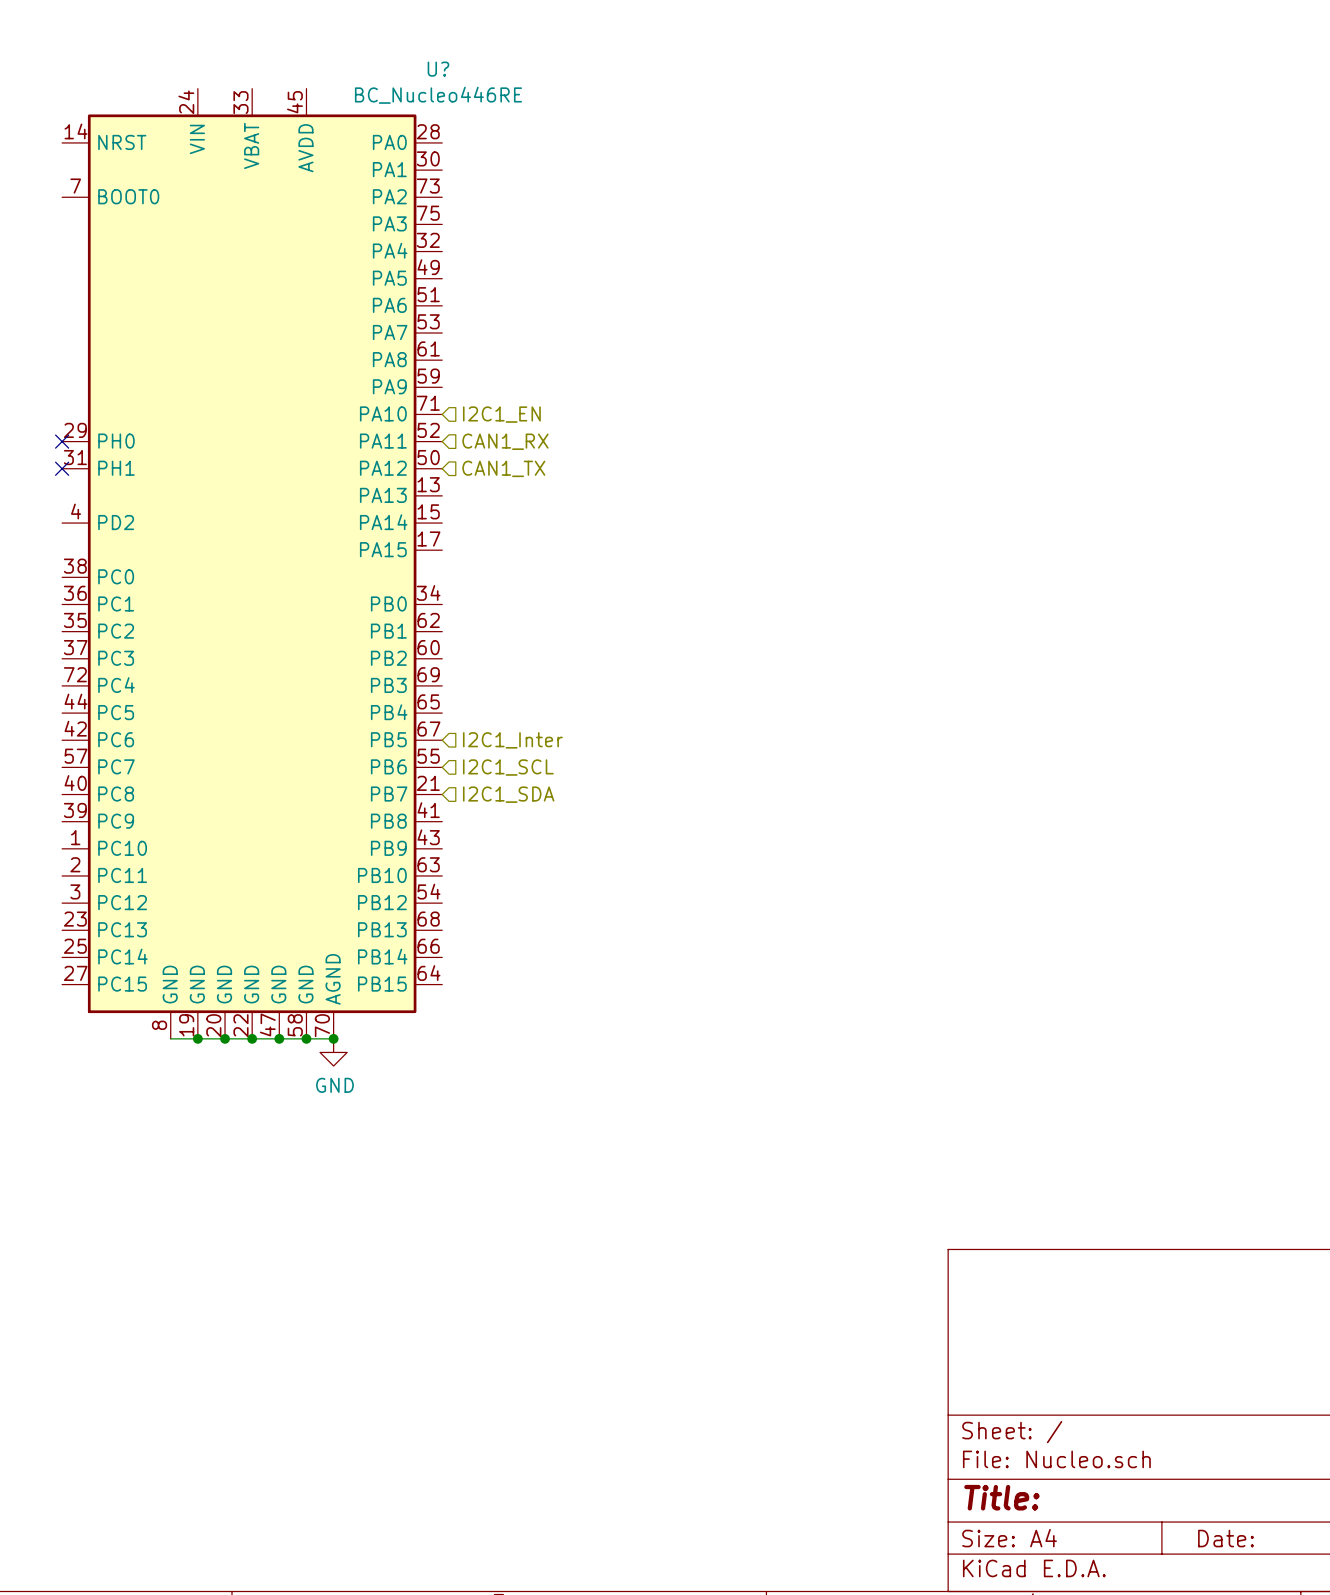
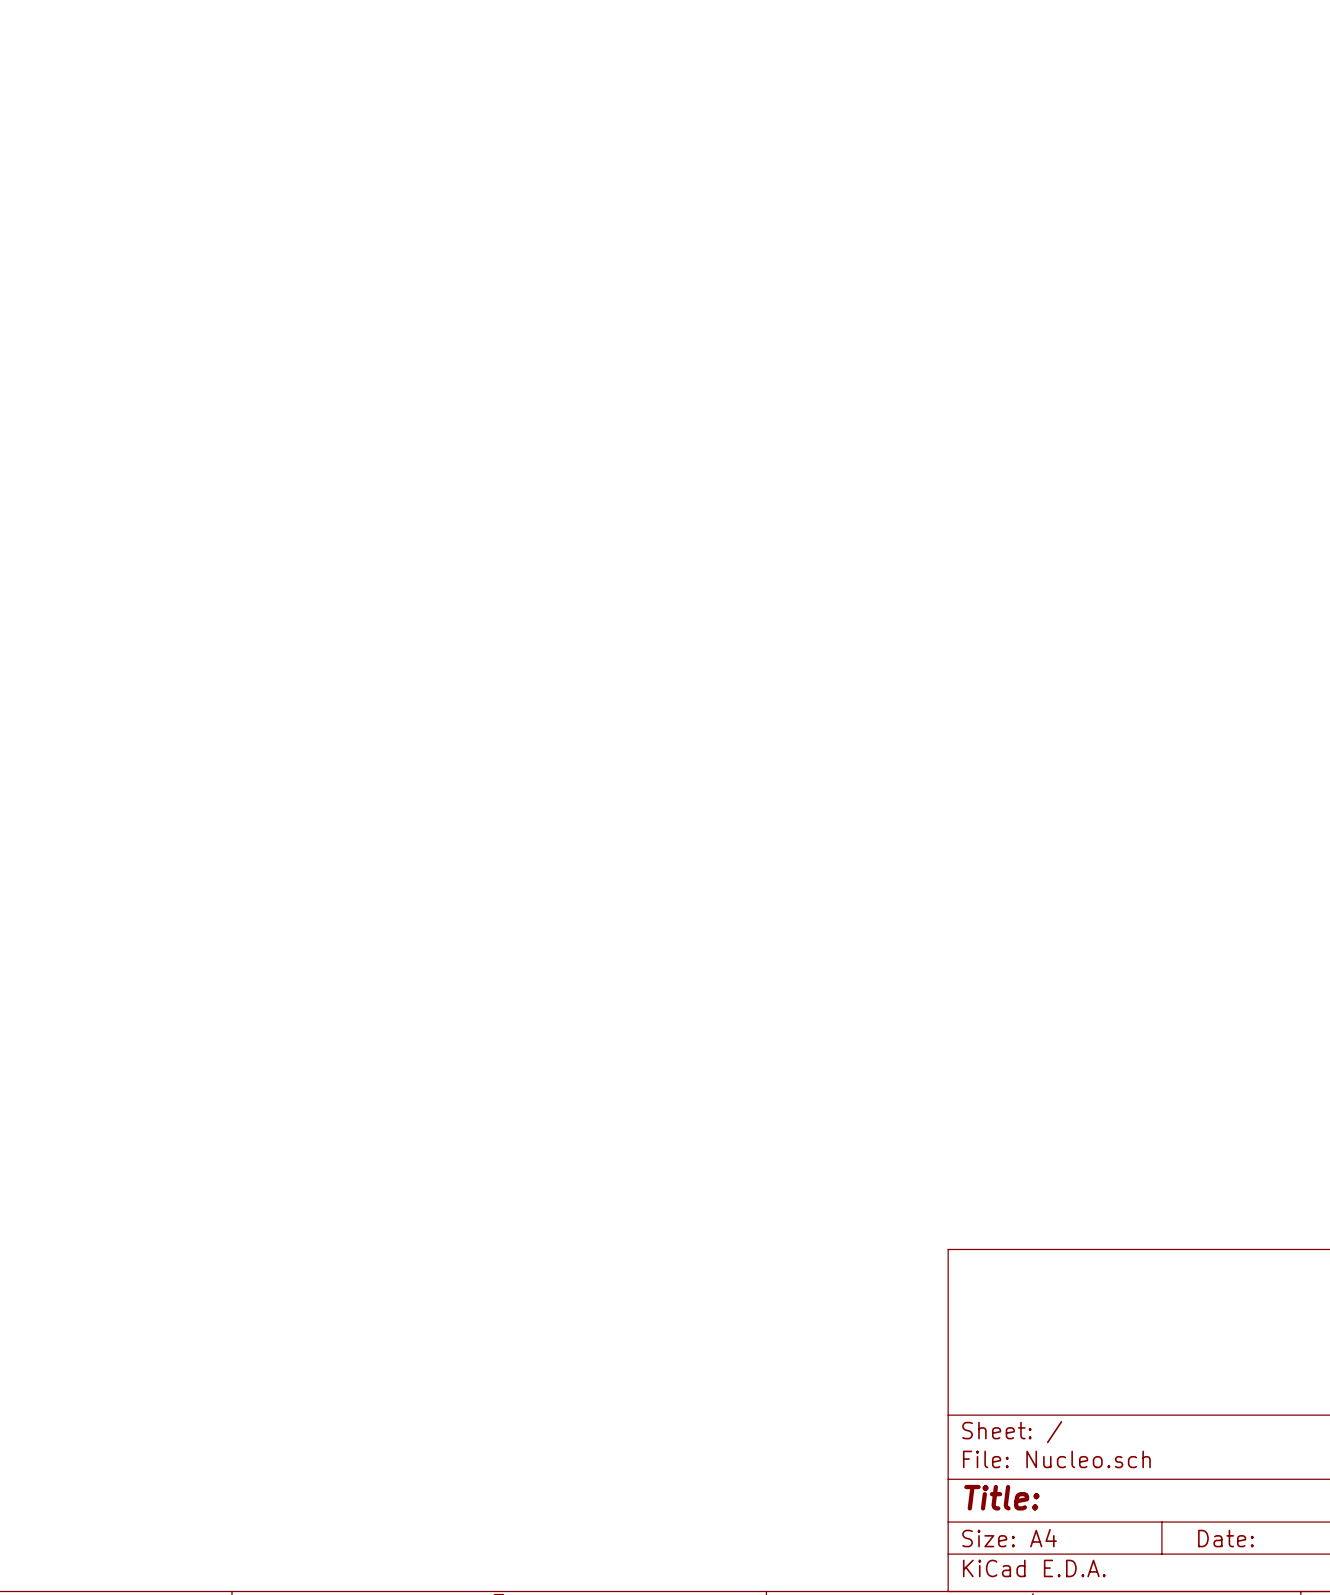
hierarchical label: I2C1_EN (501, 414) -> none
no-connect mark: (62, 441) -> none
hierarchical label: CAN1_RX (505, 441) -> none
no-connect mark: (62, 468) -> none
hierarchical label: CAN1_TX (503, 468) -> none
U?: BC_Nucleo446RE (252, 563) -> none
hierarchical label: I2C1_Inter (512, 740) -> none
hierarchical label: I2C1_SCL (508, 767) -> none
hierarchical label: I2C1_SDA (508, 794) -> none
wire: (170, 1038) (333, 1038) -> none
junction: (197, 1038) -> none
junction: (225, 1038) -> none
junction: (252, 1038) -> none
junction: (279, 1038) -> none
junction: (306, 1038) -> none
junction: (333, 1038) -> none
power symbol: GND (333, 1052) -> none

